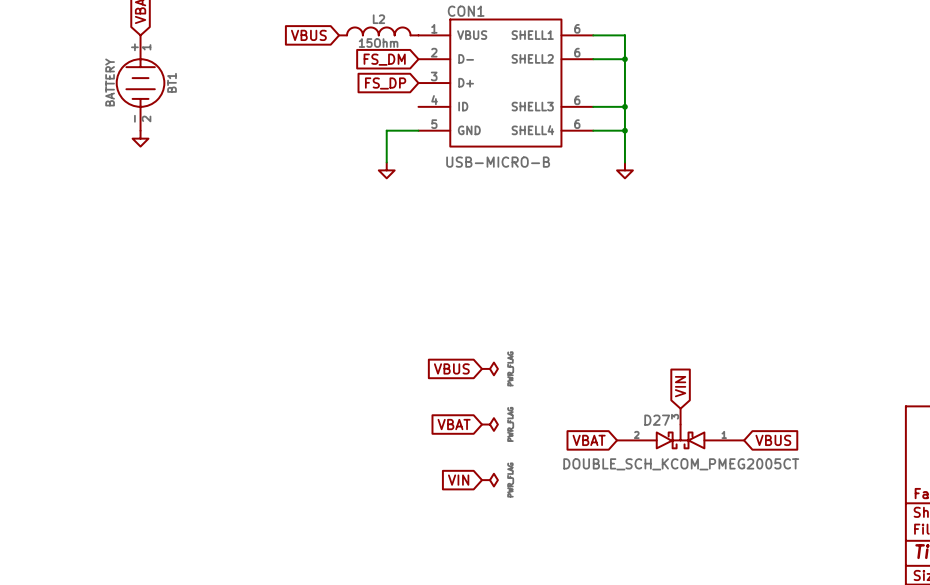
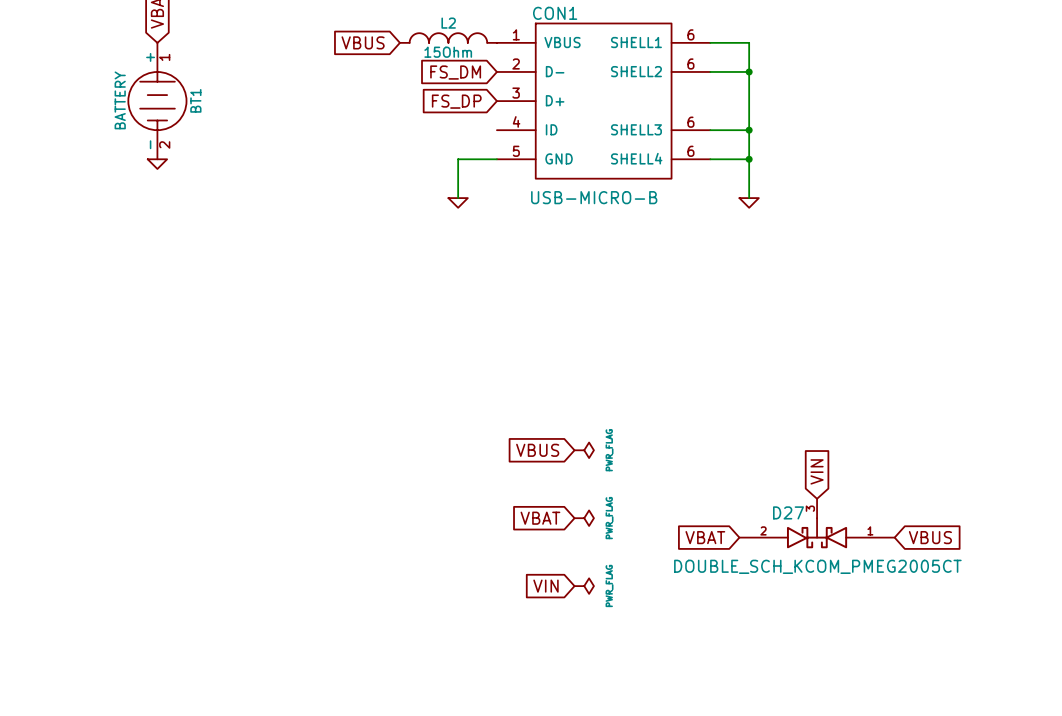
power symbol shape: [132, 130, 149, 147] -> [147, 159, 168, 169]
power symbol shape: [378, 162, 395, 179] -> [448, 198, 468, 208]
power symbol shape: [617, 162, 633, 179] -> [739, 198, 759, 208]

